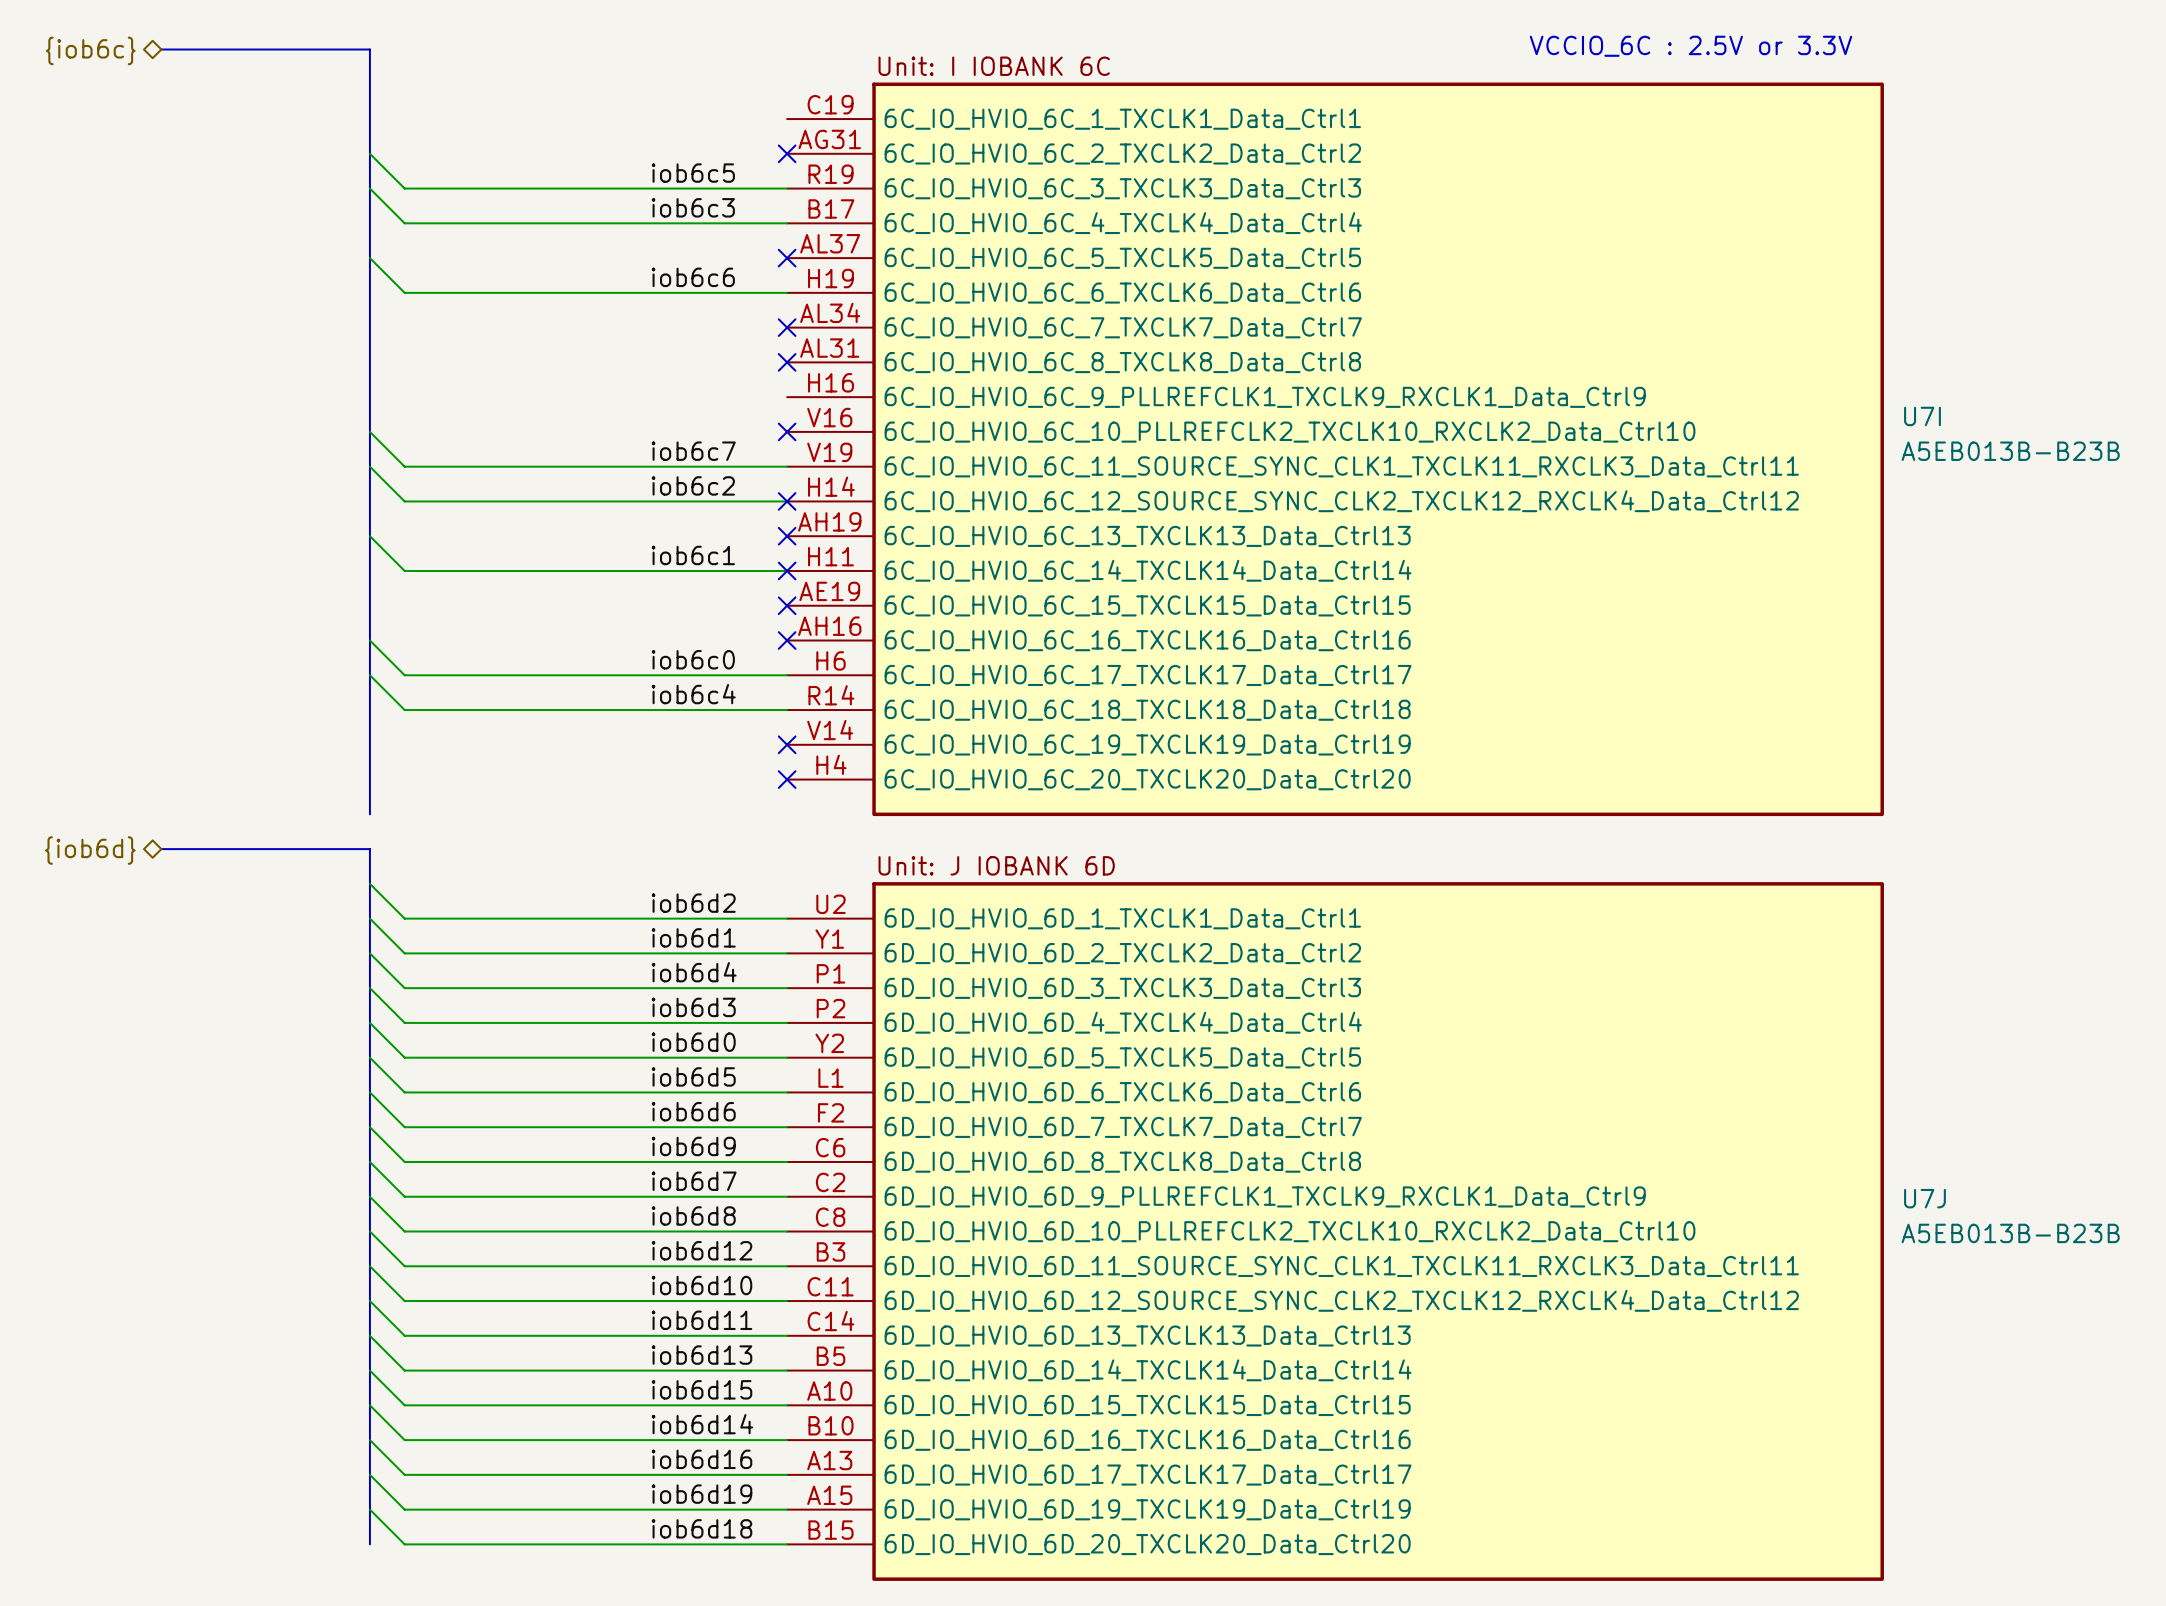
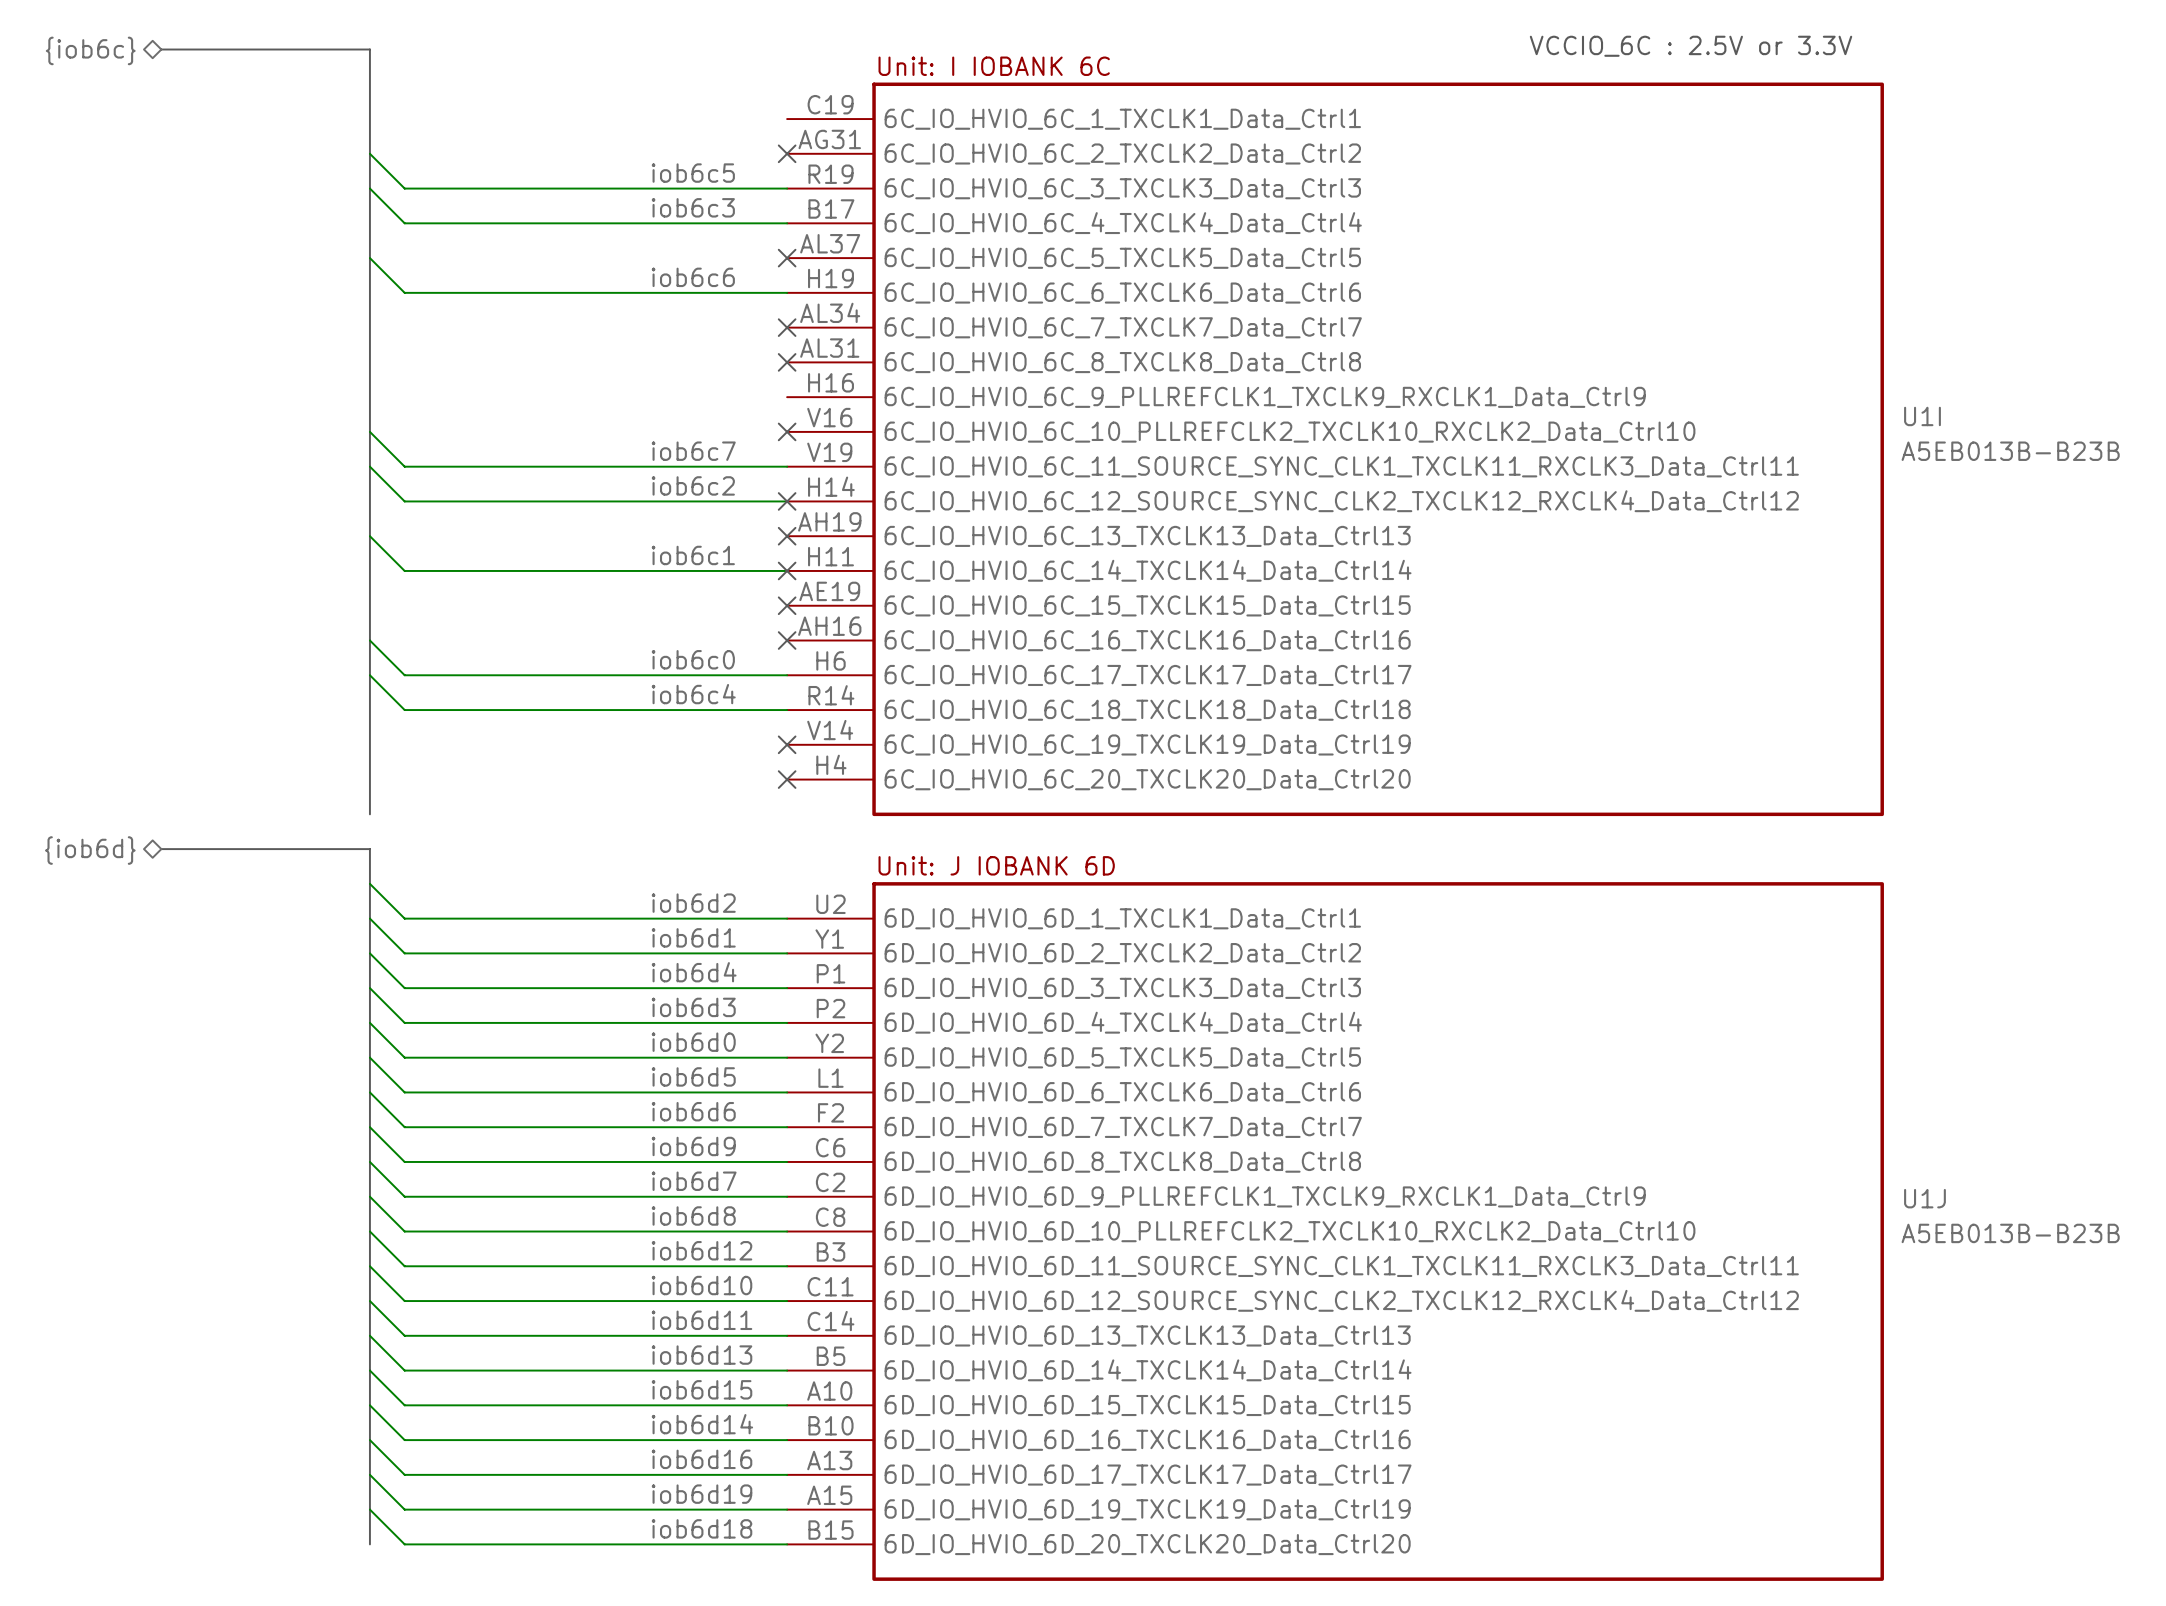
U7I name: U7I (1922, 416) -> U1I (1922, 416)
U7J name: U7J (1924, 1198) -> U1J (1924, 1198)

